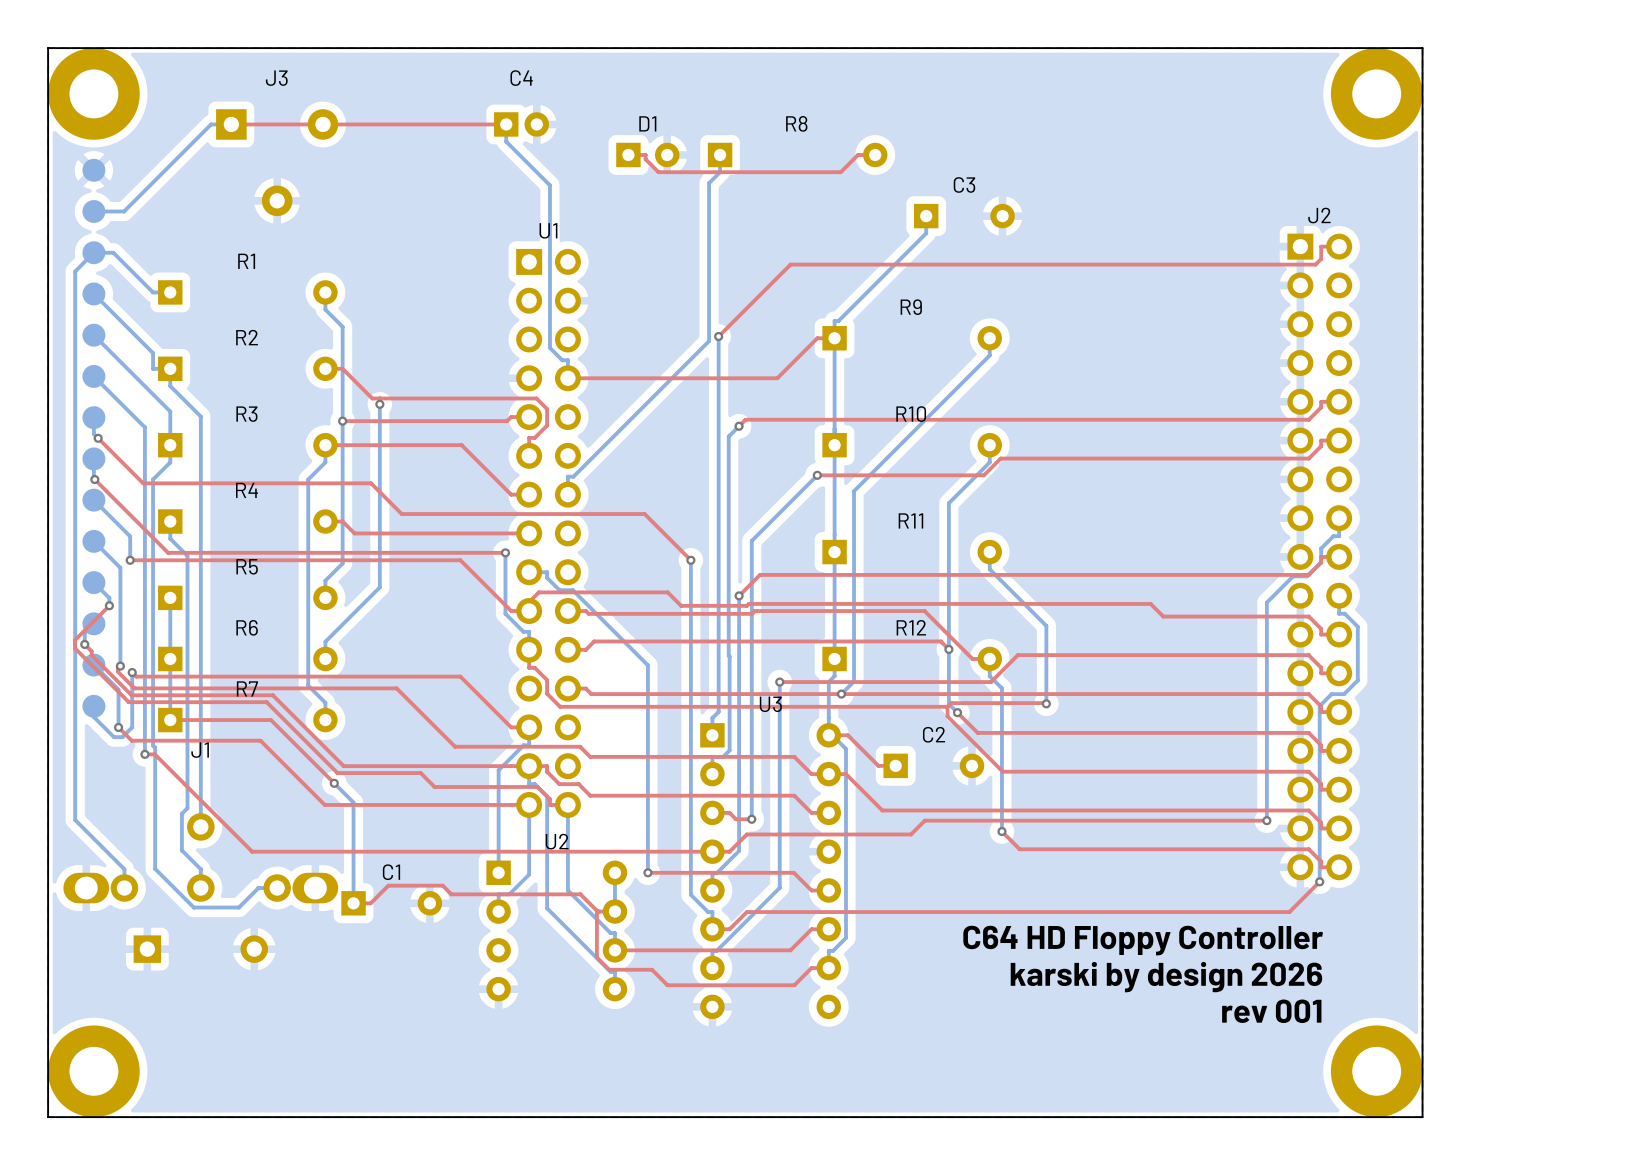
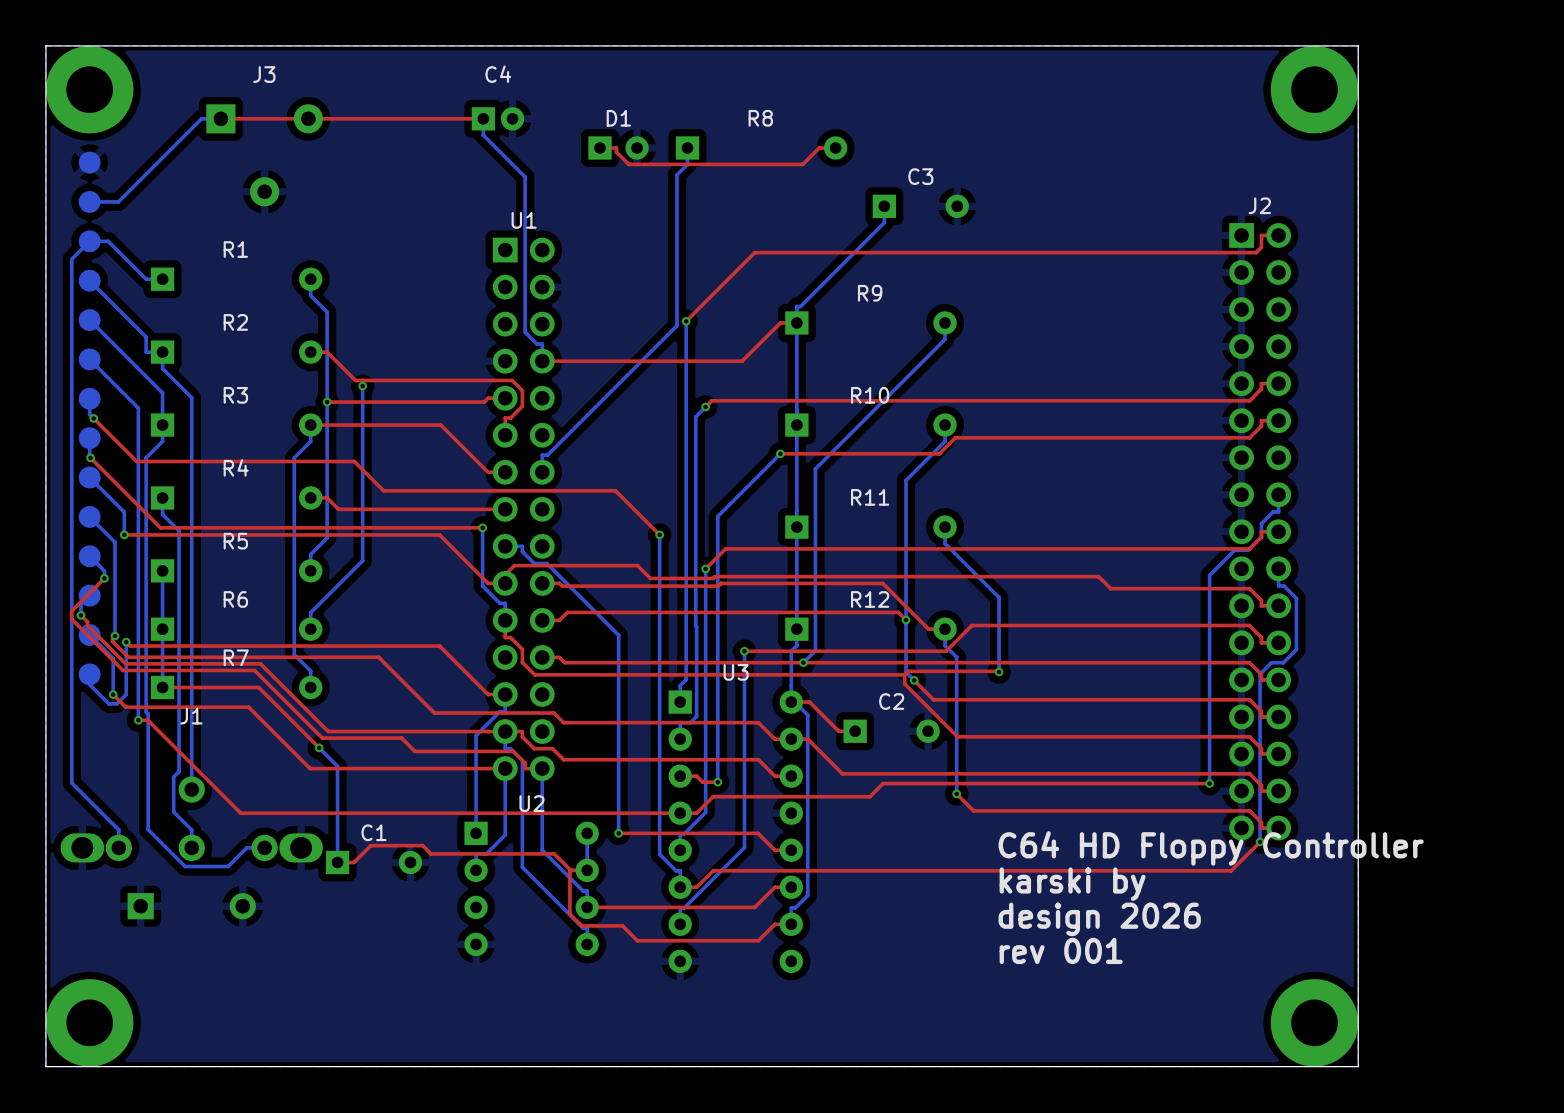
text: none -> karski by (1072, 884)
text position: C64 HD Floppy Controller (1143, 940) -> C64 HD Floppy Controller (1211, 848)
text: karski by design 2026 (1166, 977) -> design 2026 (1099, 919)
text position: rev 001 (1271, 1011) -> rev 001 (1061, 950)

